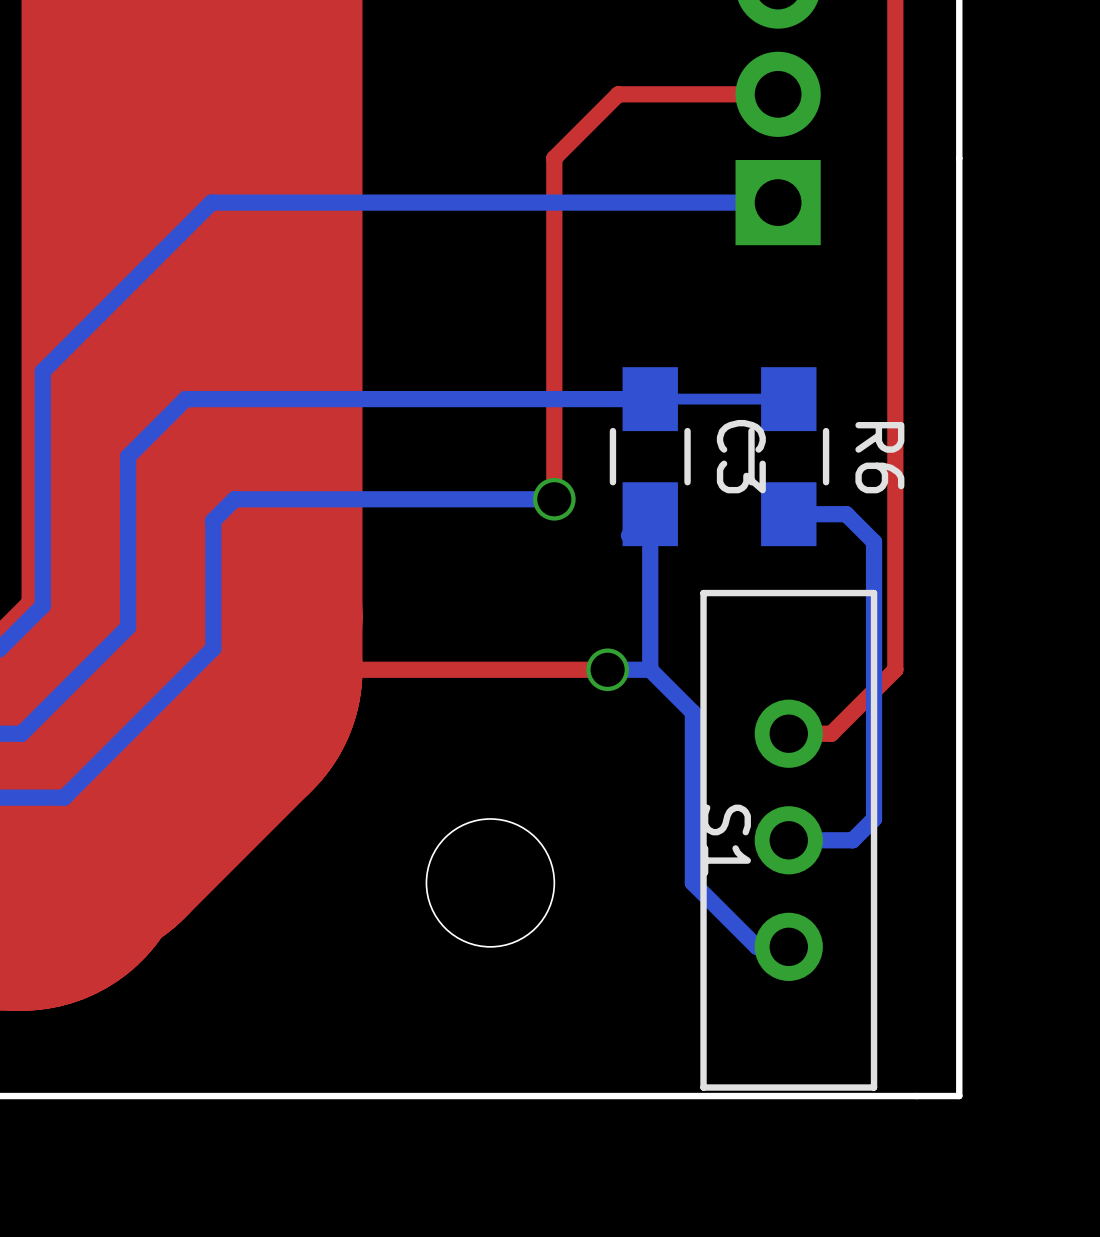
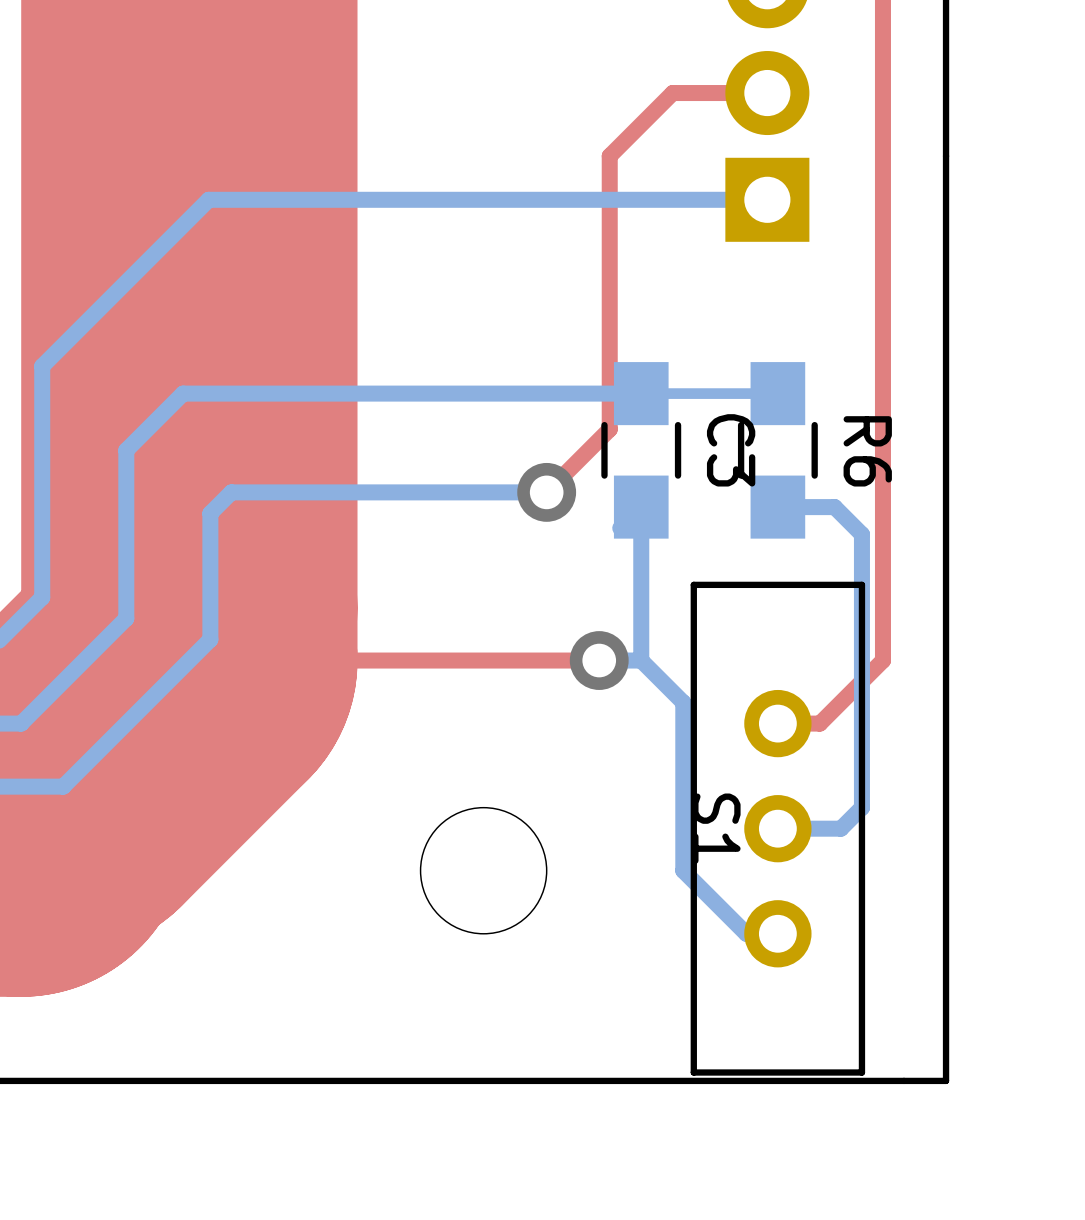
top track: (682, 94) (618, 94) (554, 158) (554, 499) -> (672, 93) (609, 156) (609, 429) (546, 492)
via size: [533, 477, 576, 521] -> [517, 462, 577, 522]
via size: [586, 648, 629, 692] -> [569, 631, 629, 690]

